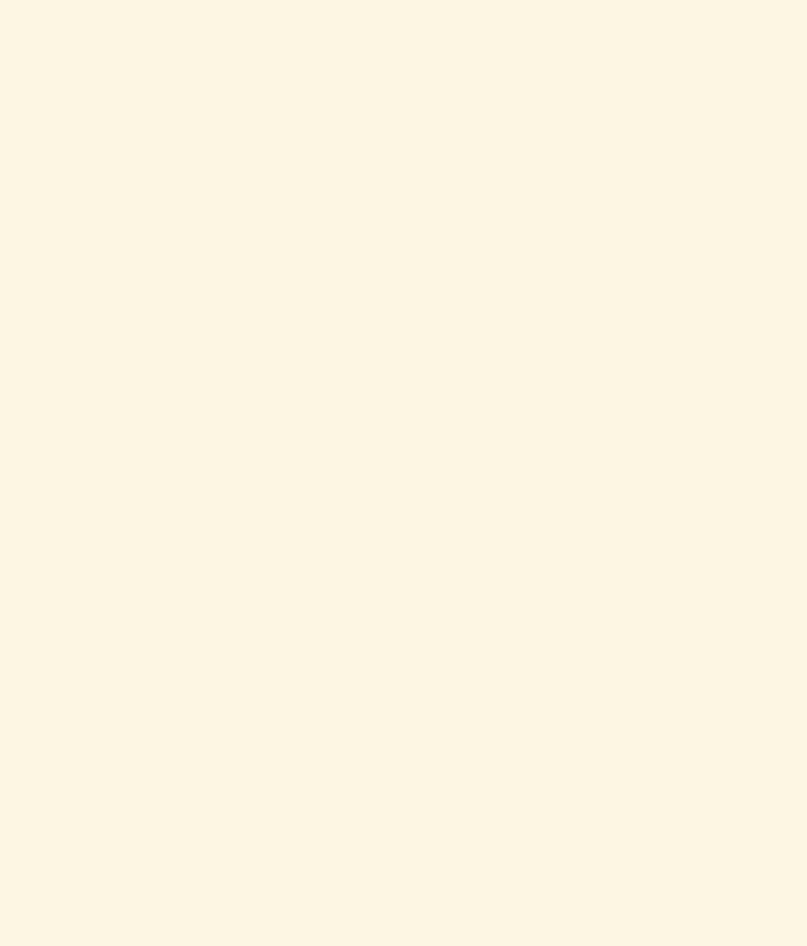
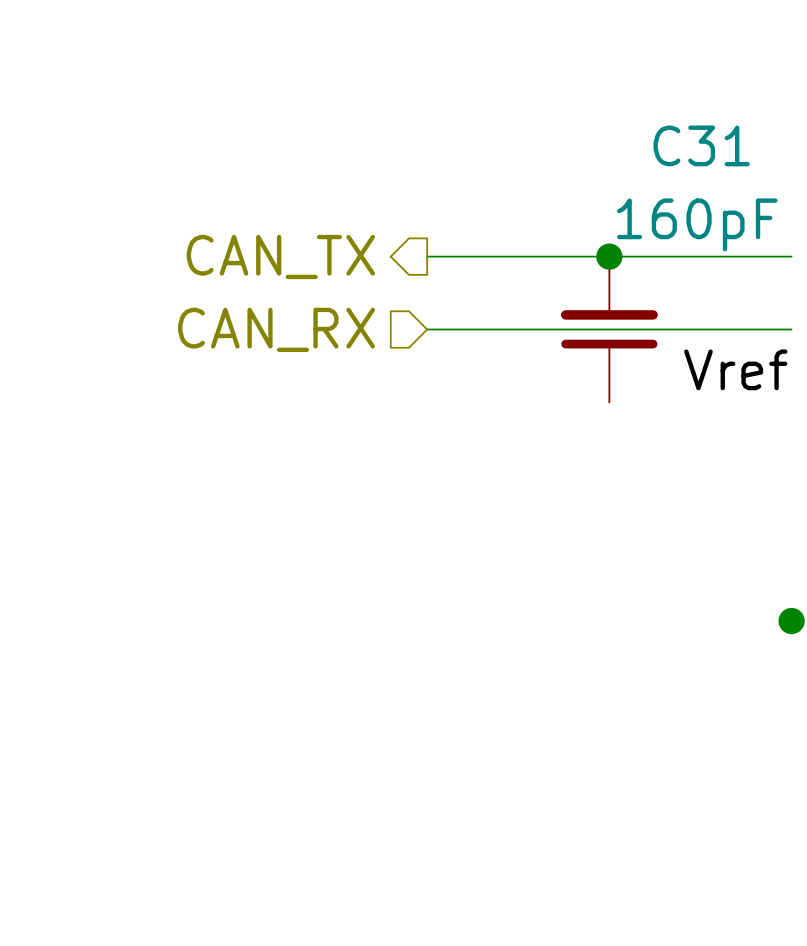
hierarchical label: none -> CAN_TX (280, 256)
wire: none -> (427, 256) (791, 256)
junction: none -> (609, 256)
hierarchical label: none -> CAN_RX (276, 329)
wire: none -> (427, 329) (791, 329)
C31: none -> 160pF (609, 329)
label: none -> Vref (735, 369)
junction: none -> (791, 621)

